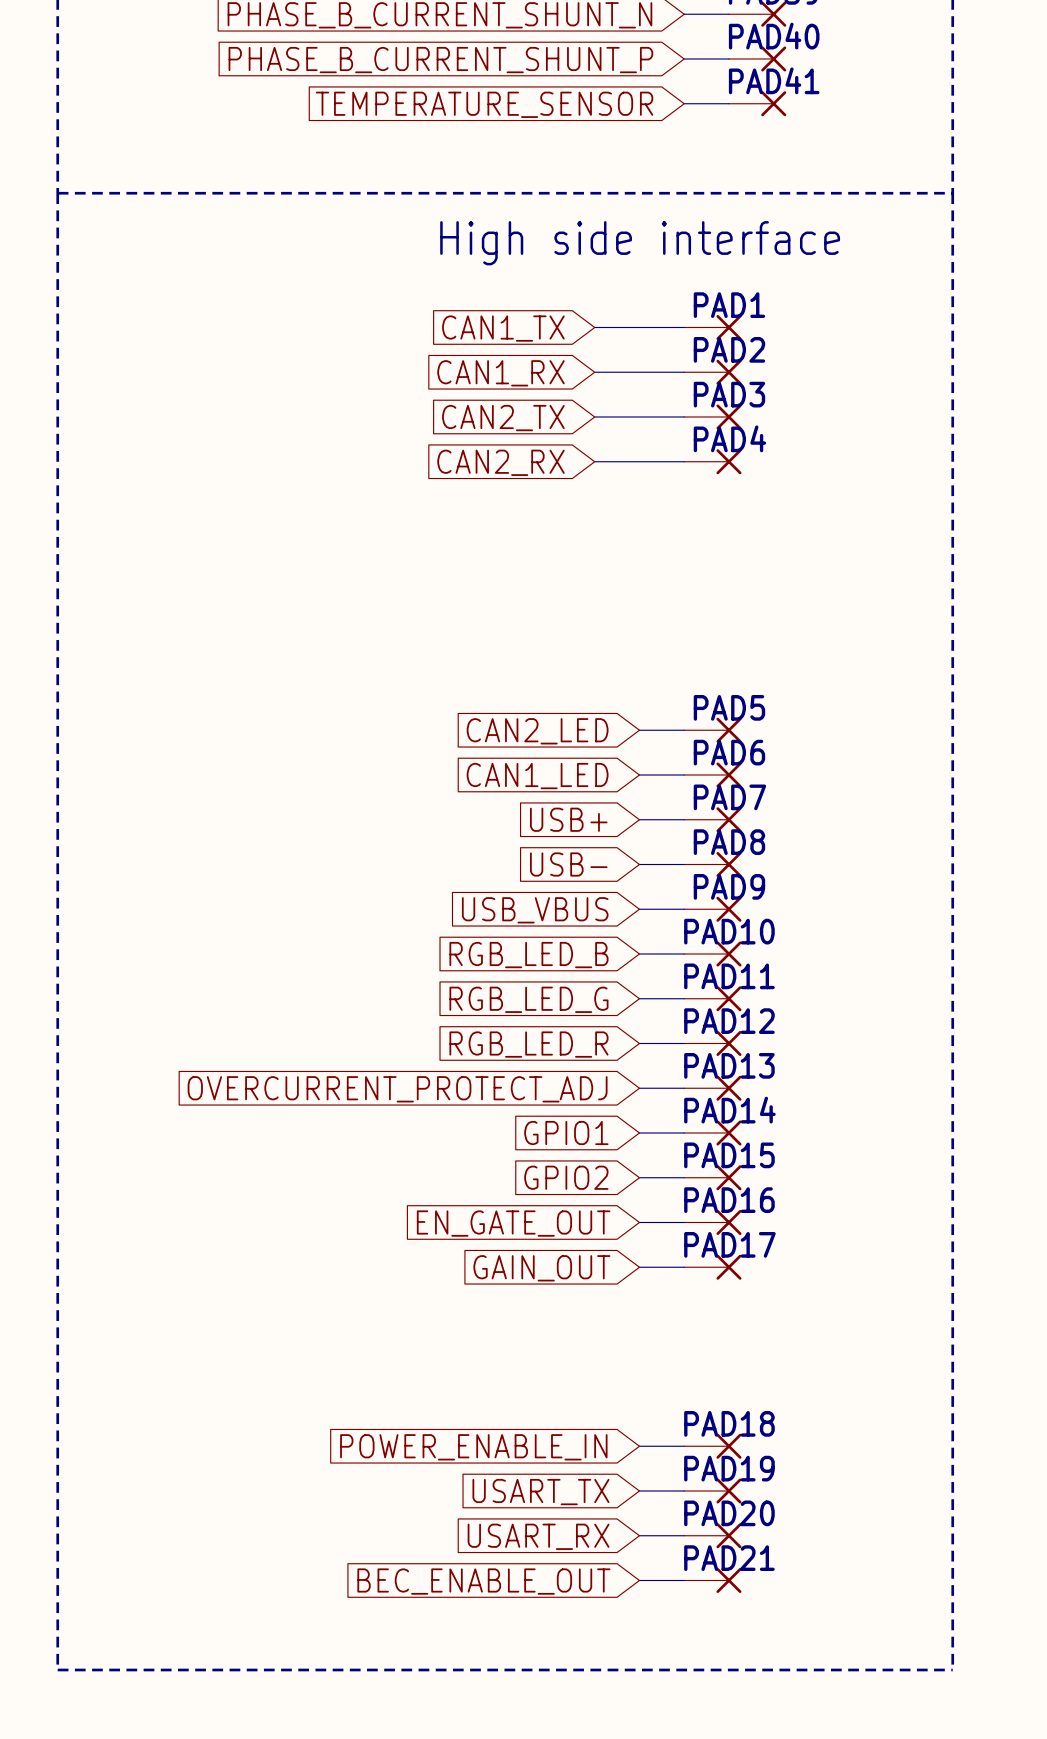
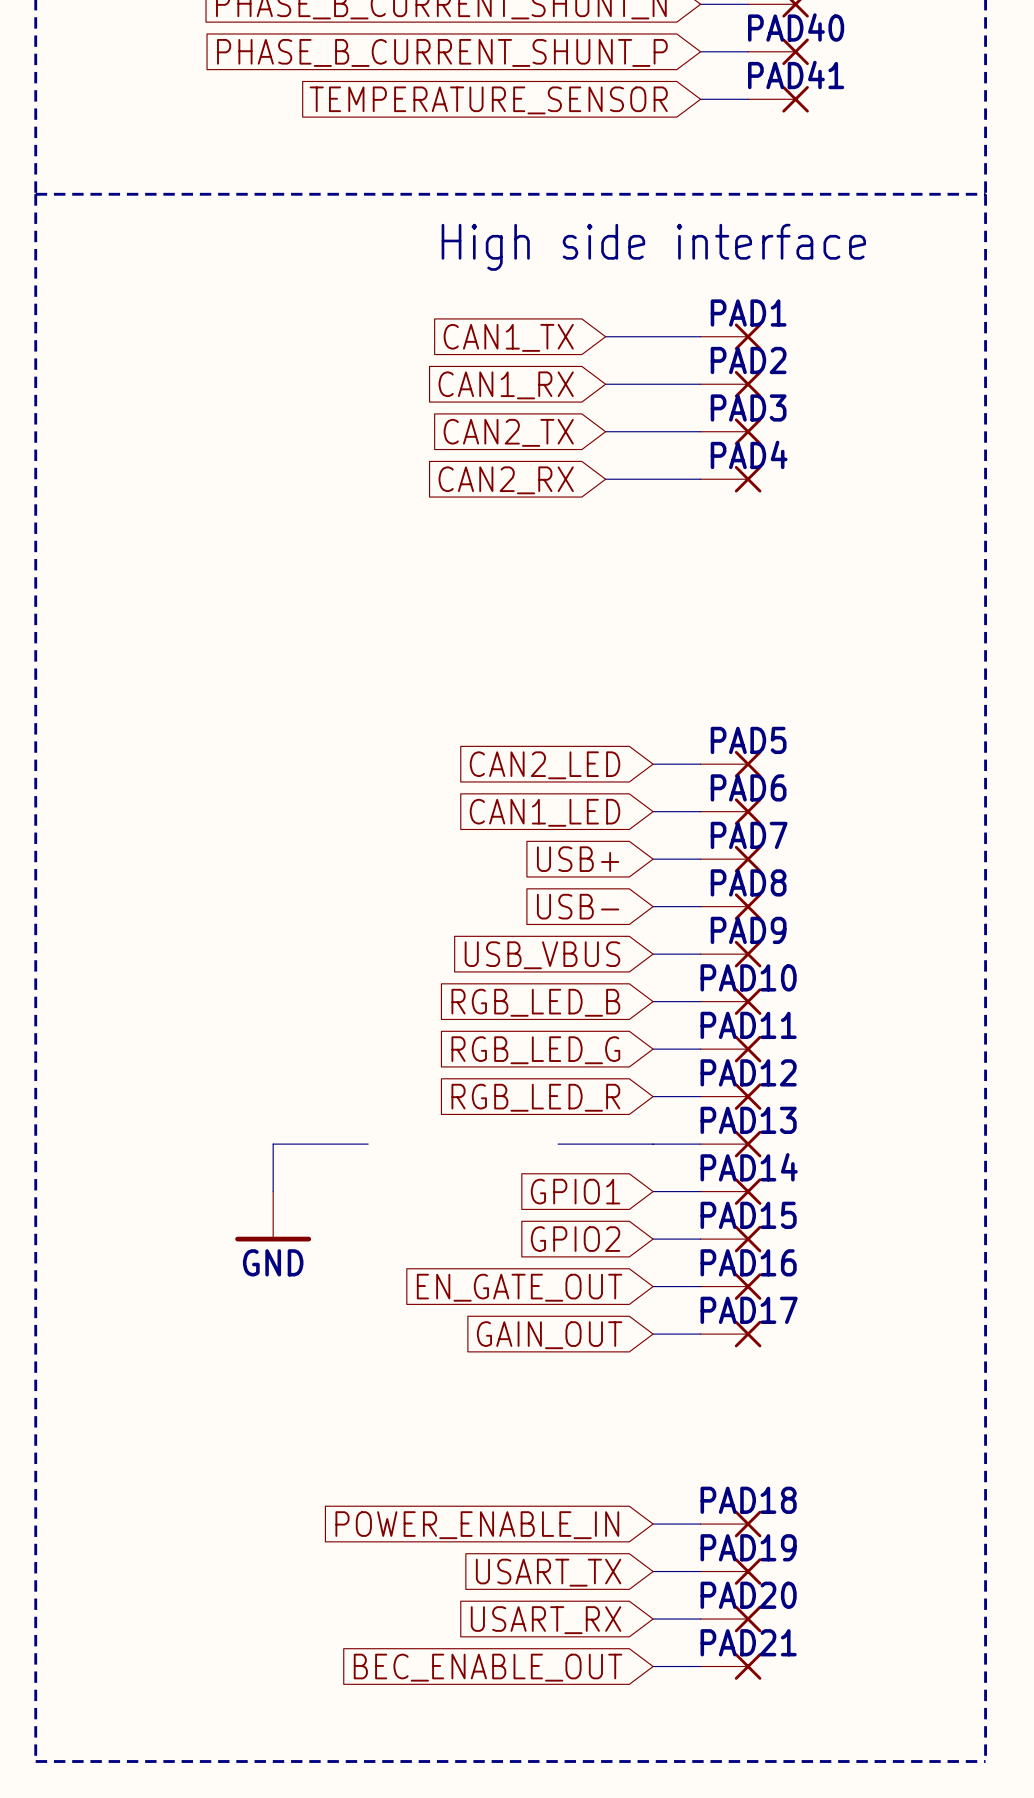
wire: none -> (368, 1144) (273, 1144) (273, 1191)
wire: none -> (558, 1144) (653, 1144)
global label: OVERCURRENT_PROTECT_ADJ (397, 1089) -> none
power symbol: none -> GND (273, 1216)

